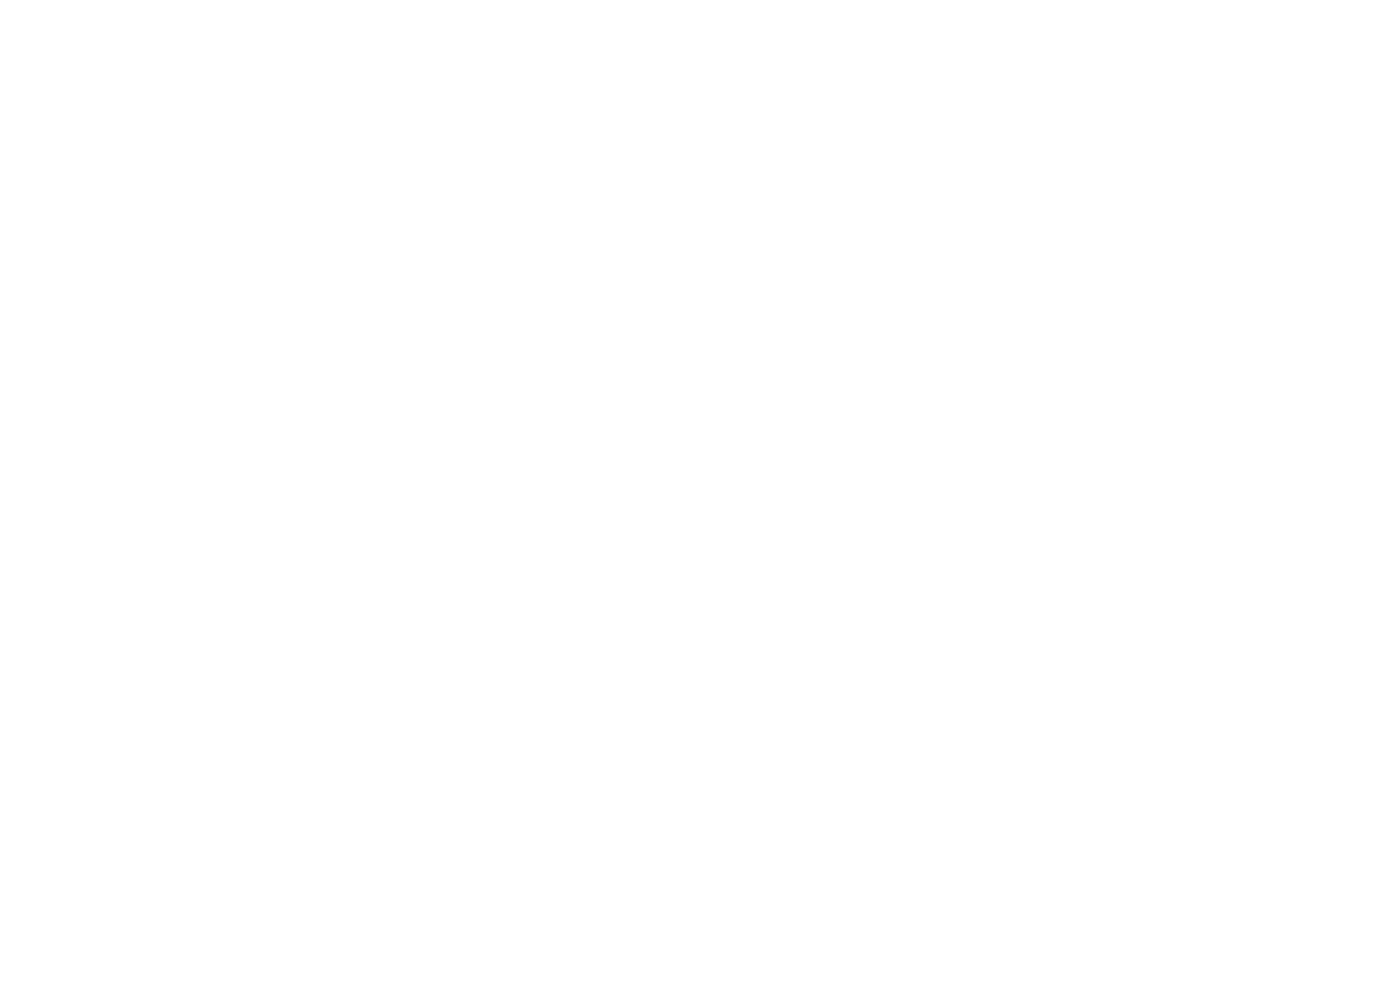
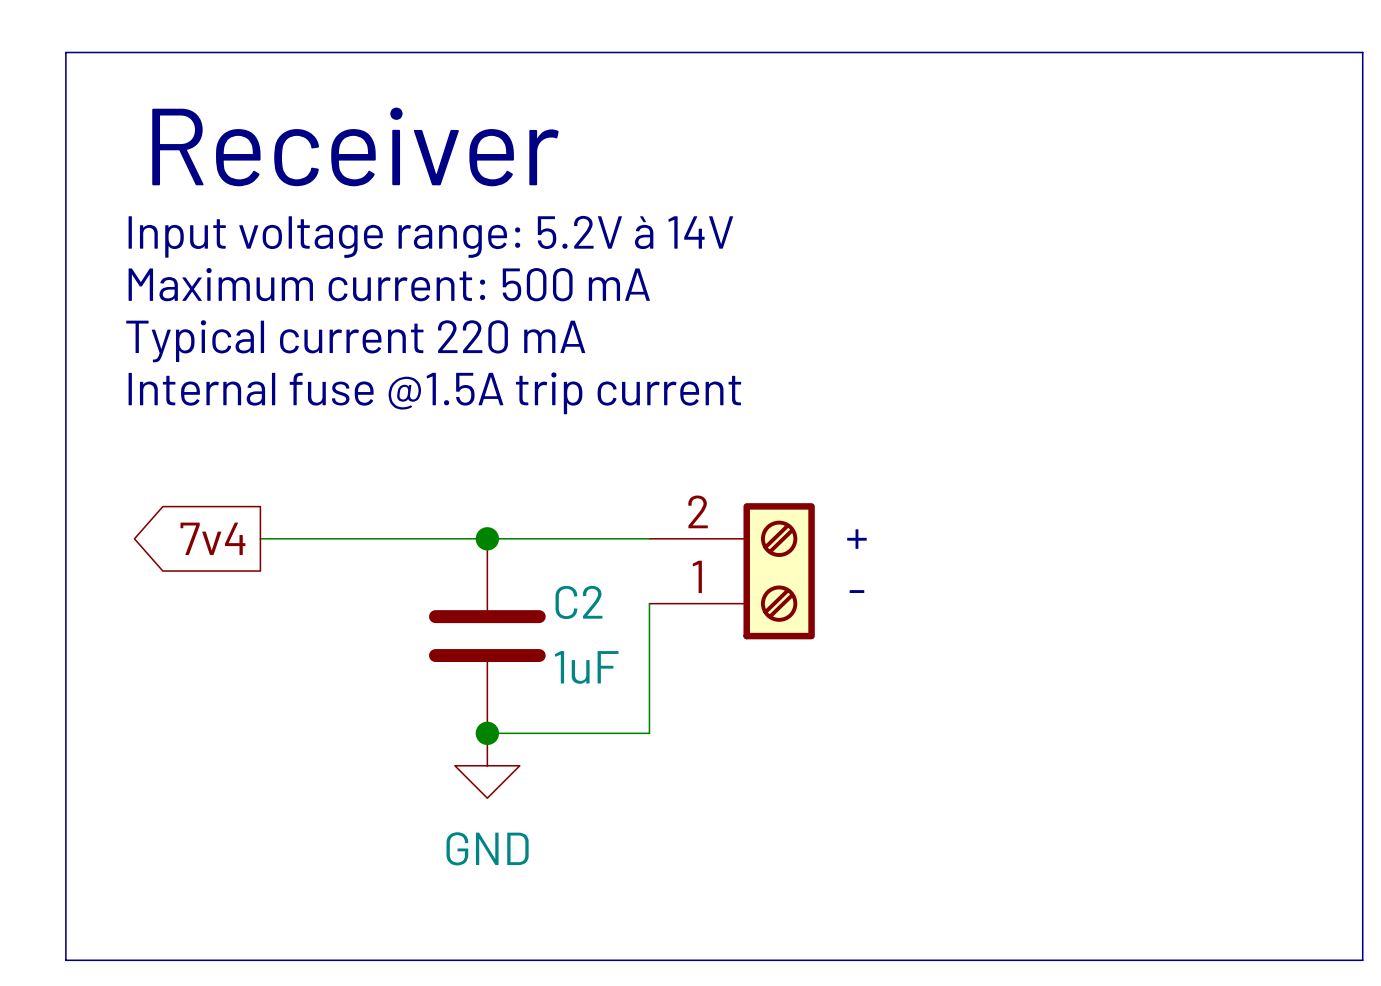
line: none -> (65, 52) (1362, 52) (1362, 960) (65, 960) (65, 52)
text: none -> Receiver (355, 146)
text: none -> Input voltage range: 5.2V à 14V (430, 236)
text: none -> Maximum current: 500 mA (389, 284)
text: none -> Typical current 220 mA (355, 341)
text: none -> Internal fuse @1.5A trip current (434, 393)
wire: none -> (260, 538) (649, 538)
junction: none -> (487, 538)
global label: none -> 7v4 (212, 538)
text: none -> + (856, 539)
part: none -> (732, 571)
text: none -> - (856, 591)
wire: none -> (649, 603) (649, 733) (487, 733)
C2: none -> 1uF (487, 636)
junction: none -> (487, 733)
power symbol: none -> GND (487, 765)

